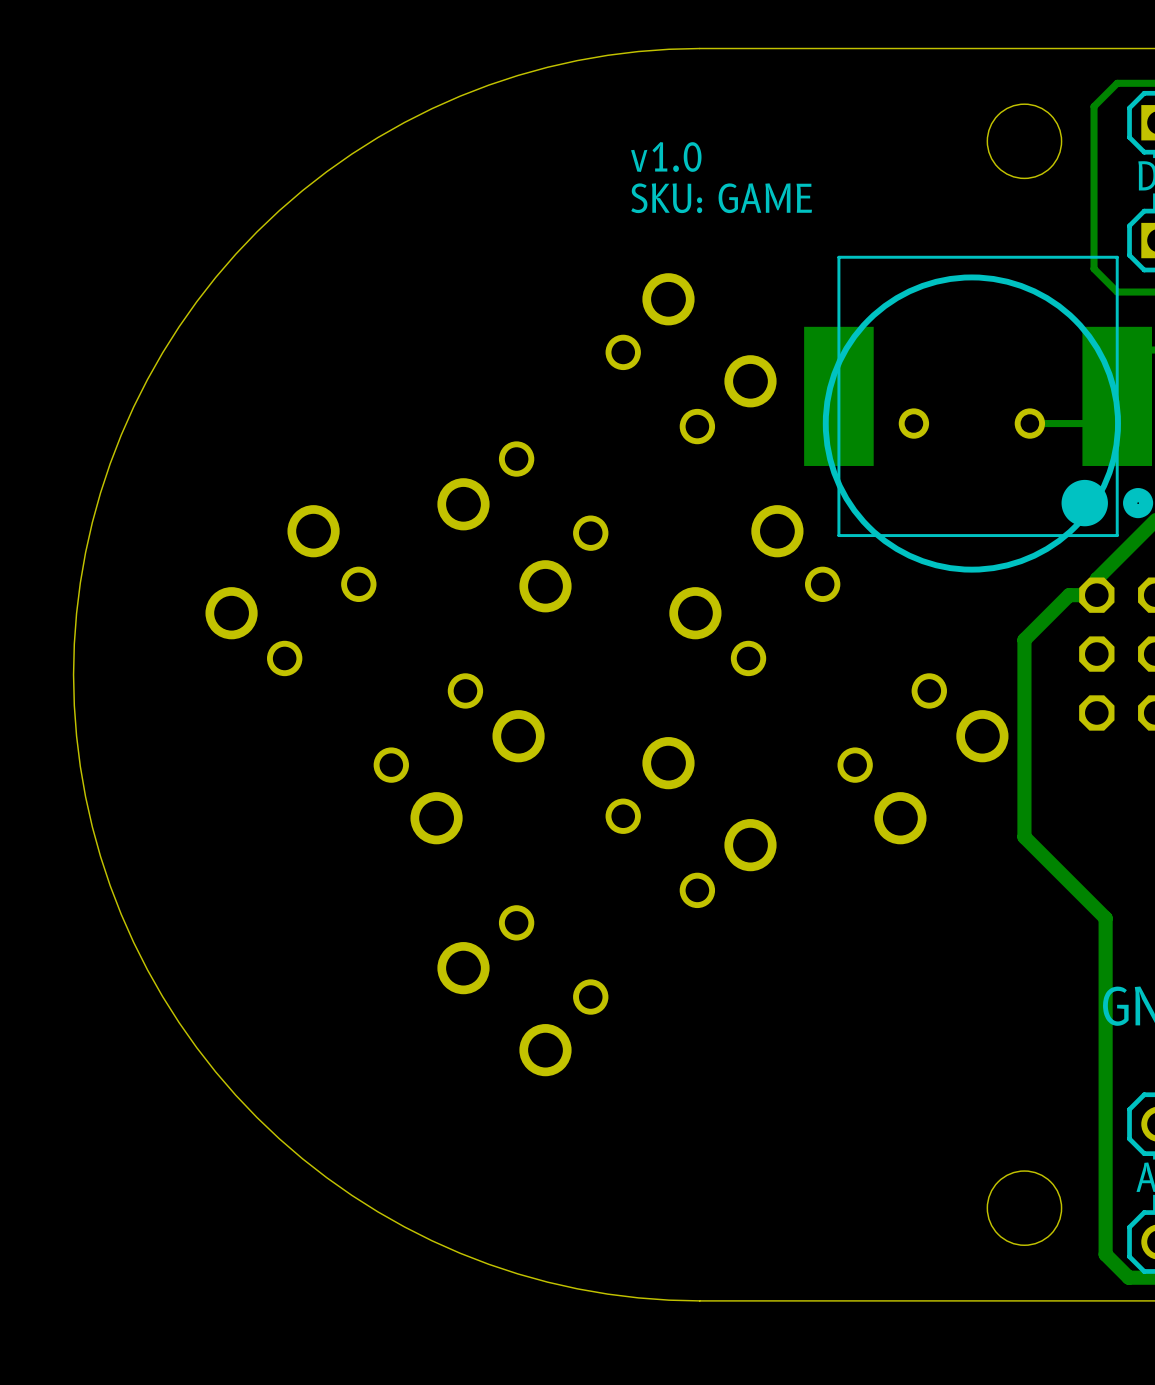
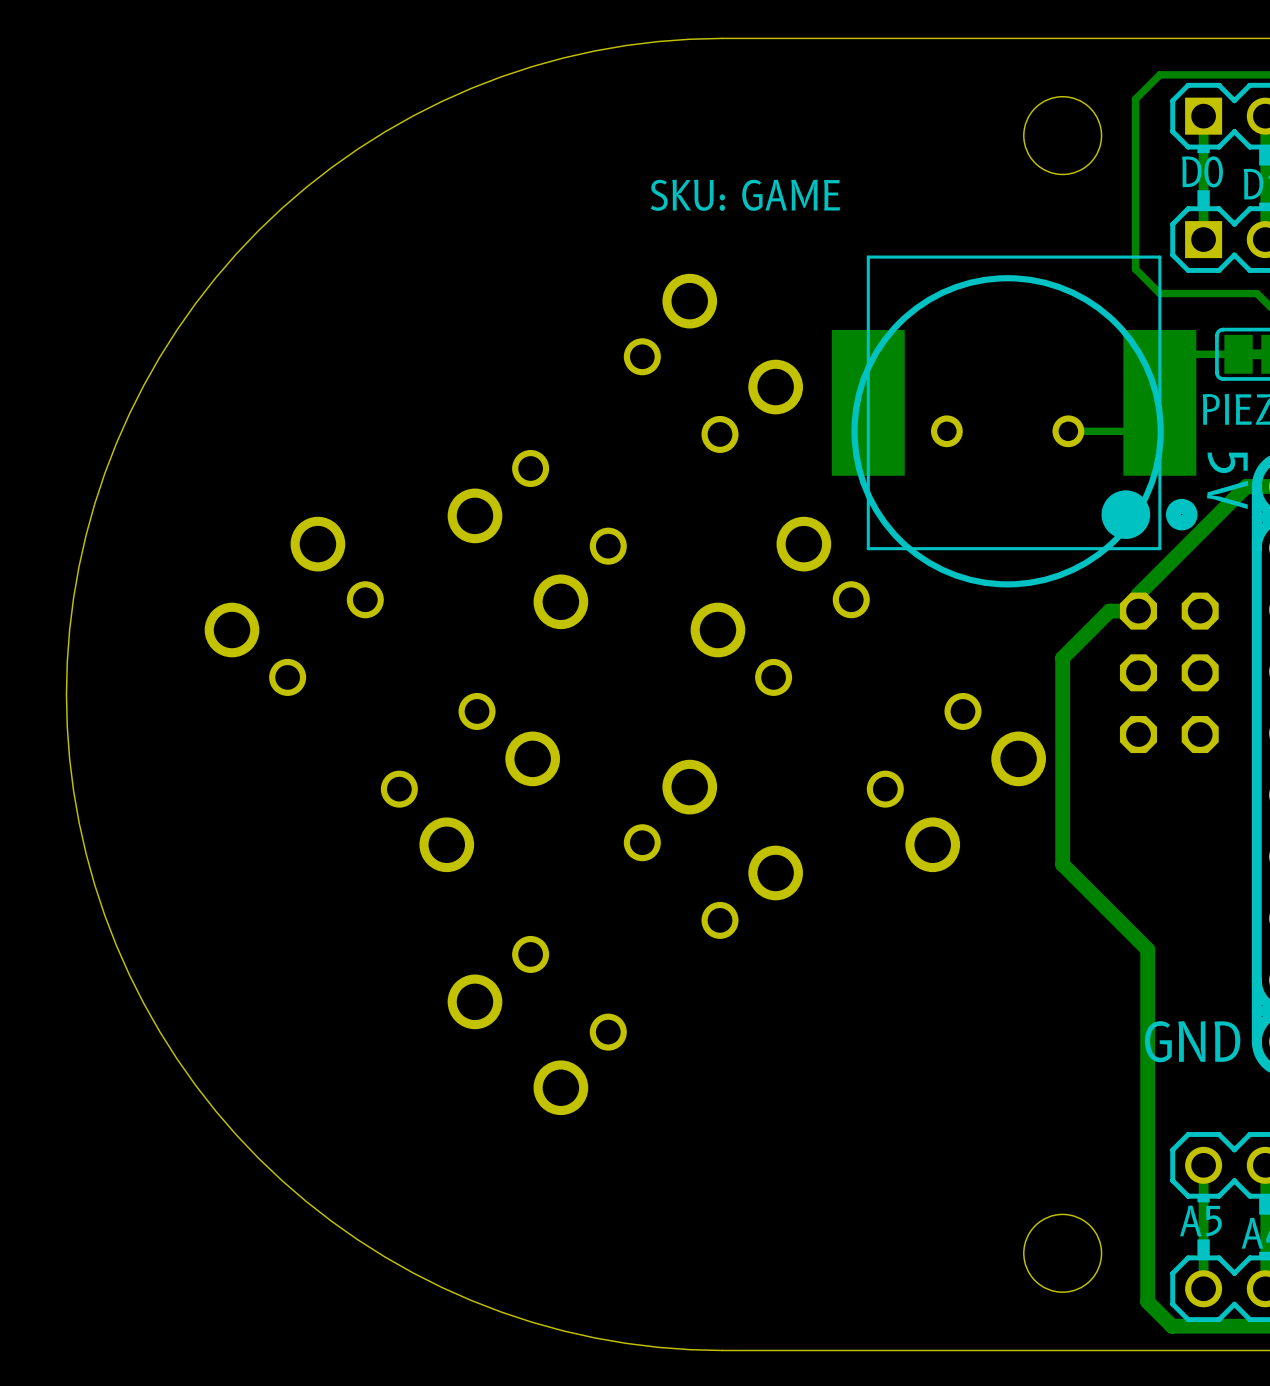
text: v1.0 (666, 157) -> none

